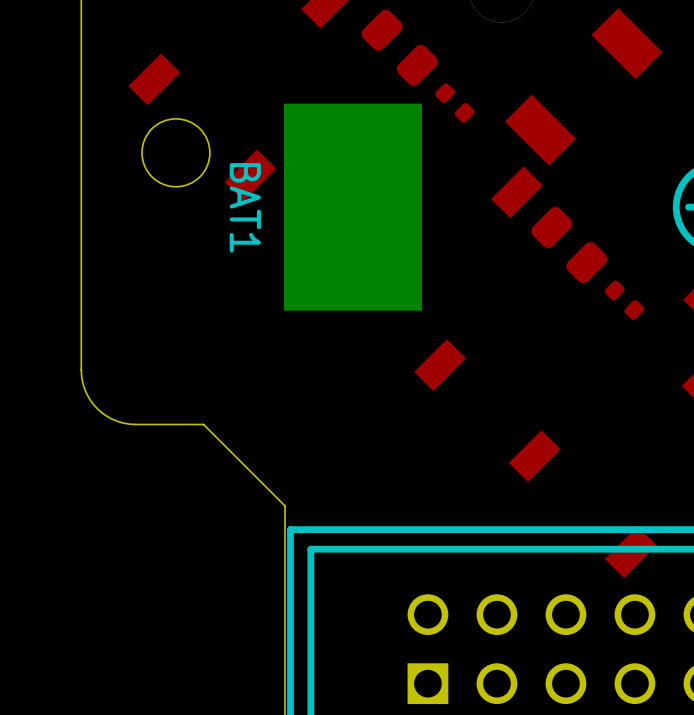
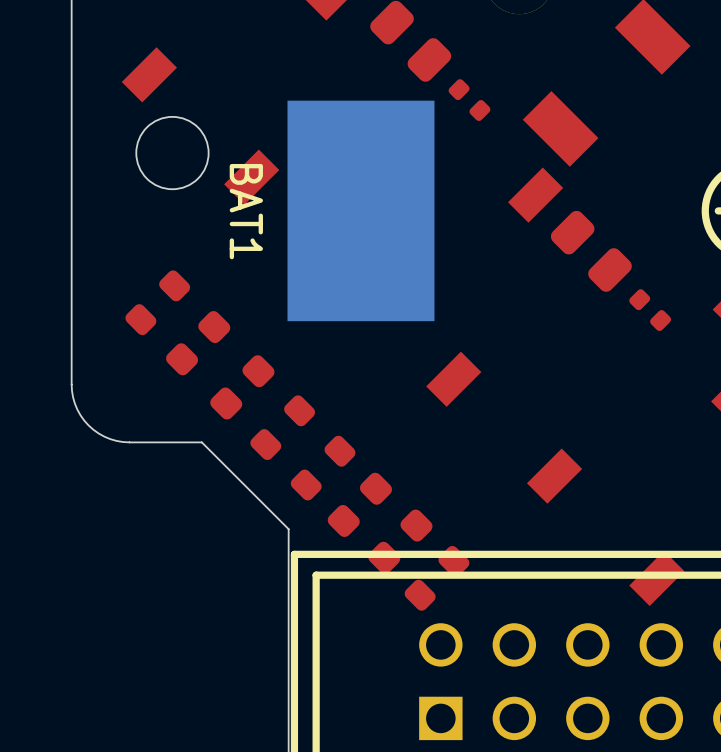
part: none -> (157, 302)
part: none -> (198, 343)
part: none -> (242, 387)
part: none -> (282, 427)
part: none -> (323, 468)
part: none -> (359, 504)
part: none -> (400, 541)
part: none -> (437, 578)

